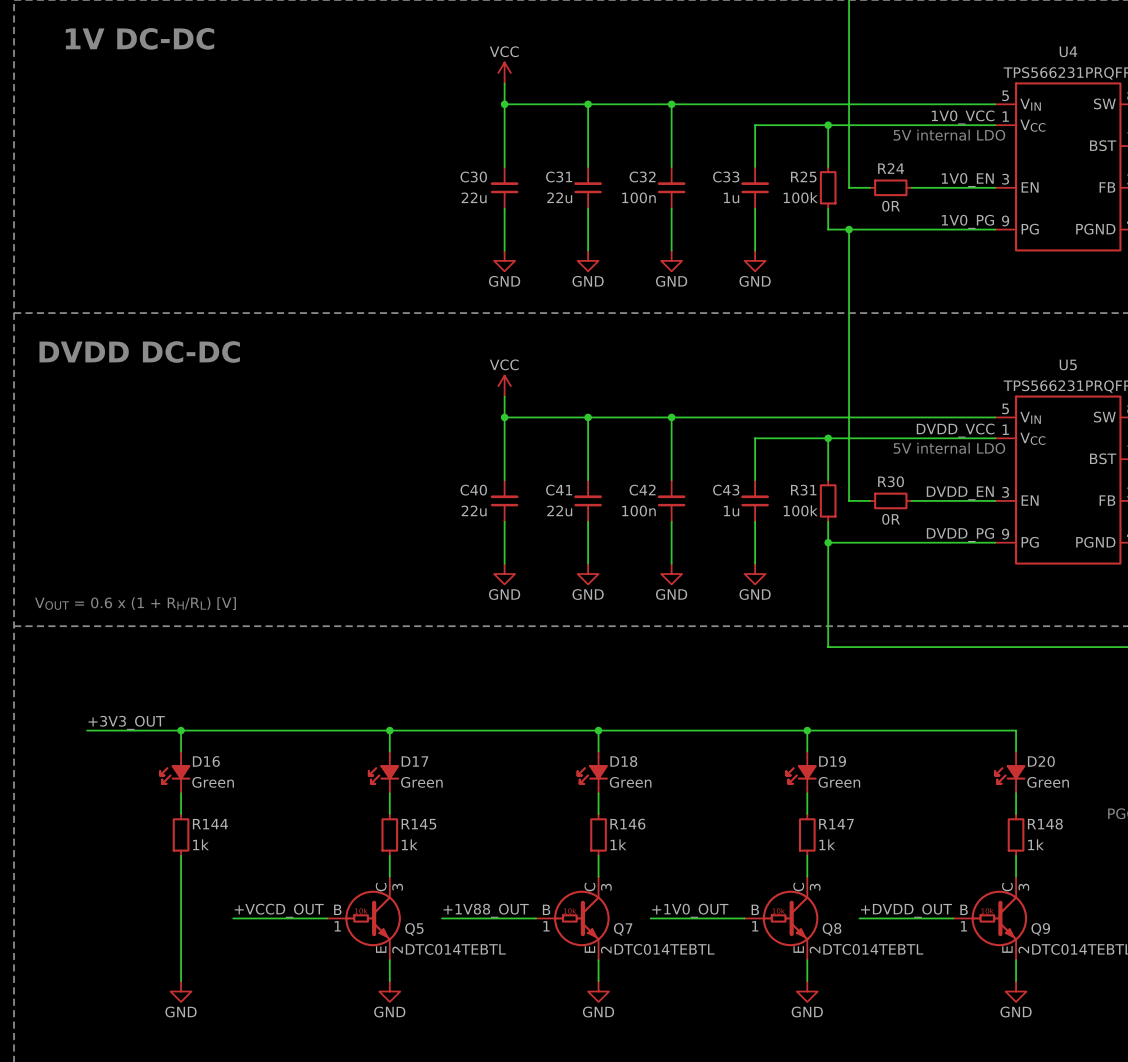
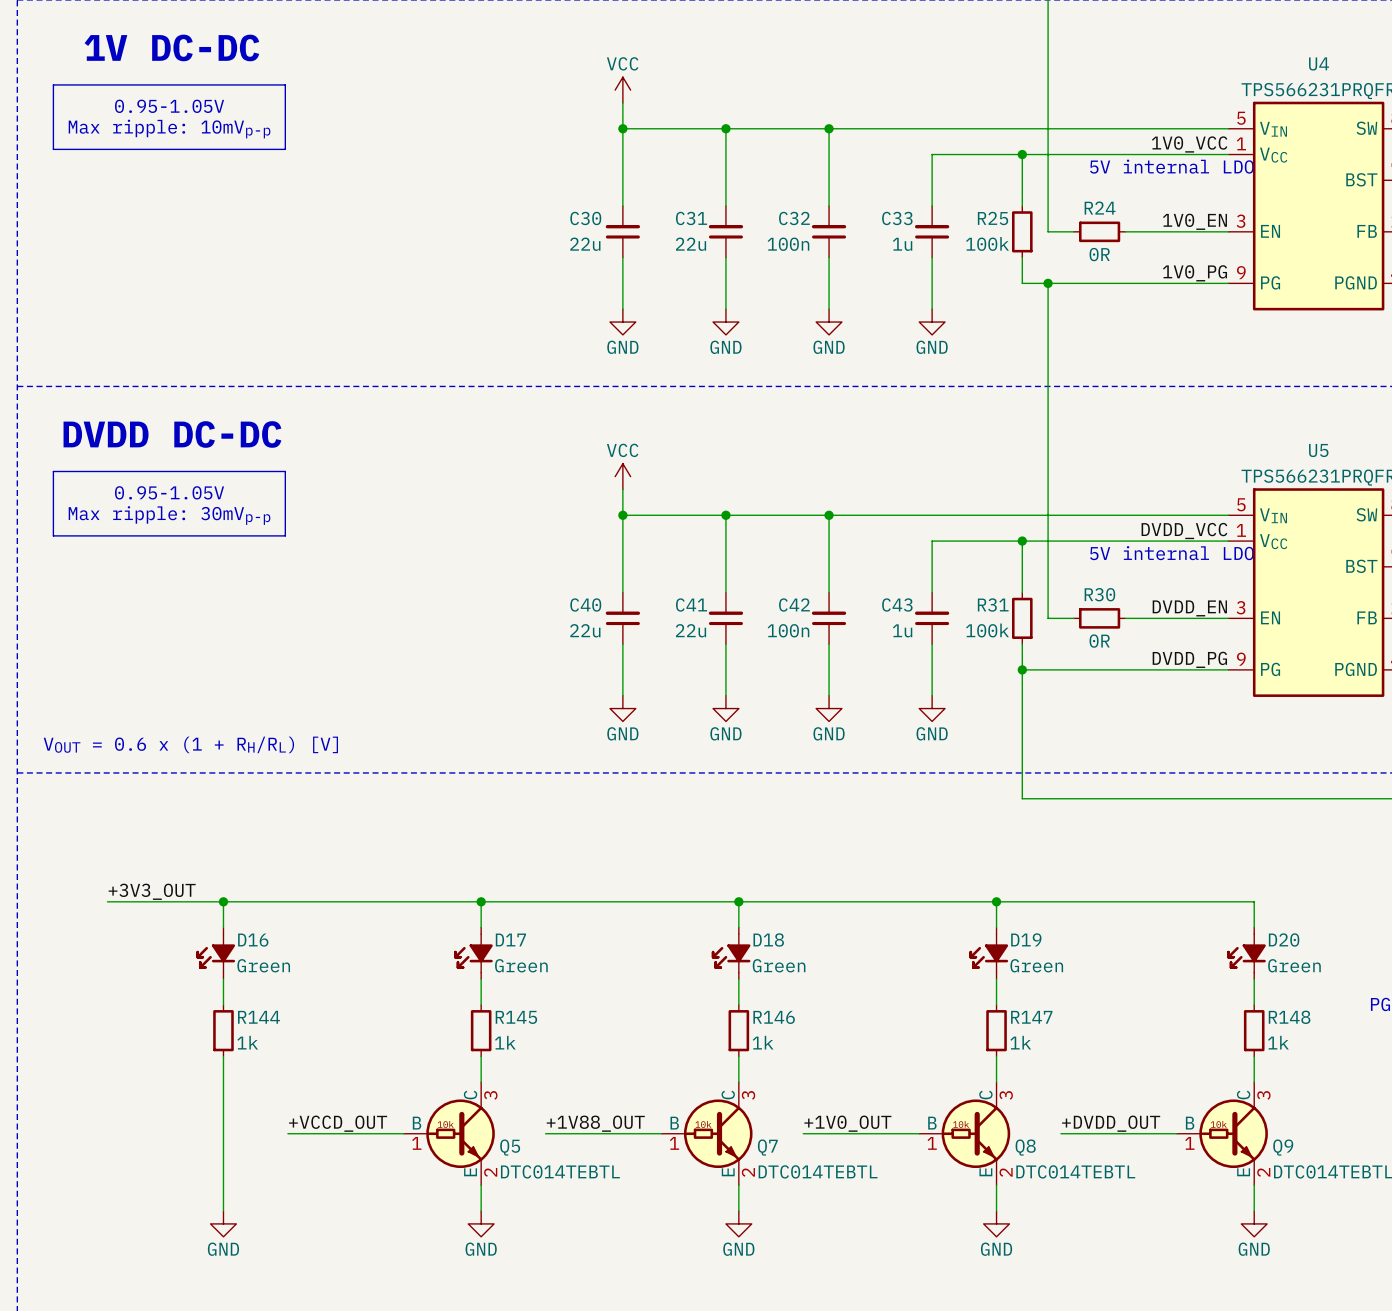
line: none -> (53, 84) (285, 84) (285, 149) (53, 149) (53, 84)
text: none -> 0.95-1.05V (169, 106)
text: none -> Max ripple: 10mVp-p (169, 129)
line: none -> (53, 471) (53, 535) (285, 535) (285, 471) (53, 471)
text: none -> 0.95-1.05V (169, 492)
text: none -> Max ripple: 30mVp-p (169, 515)

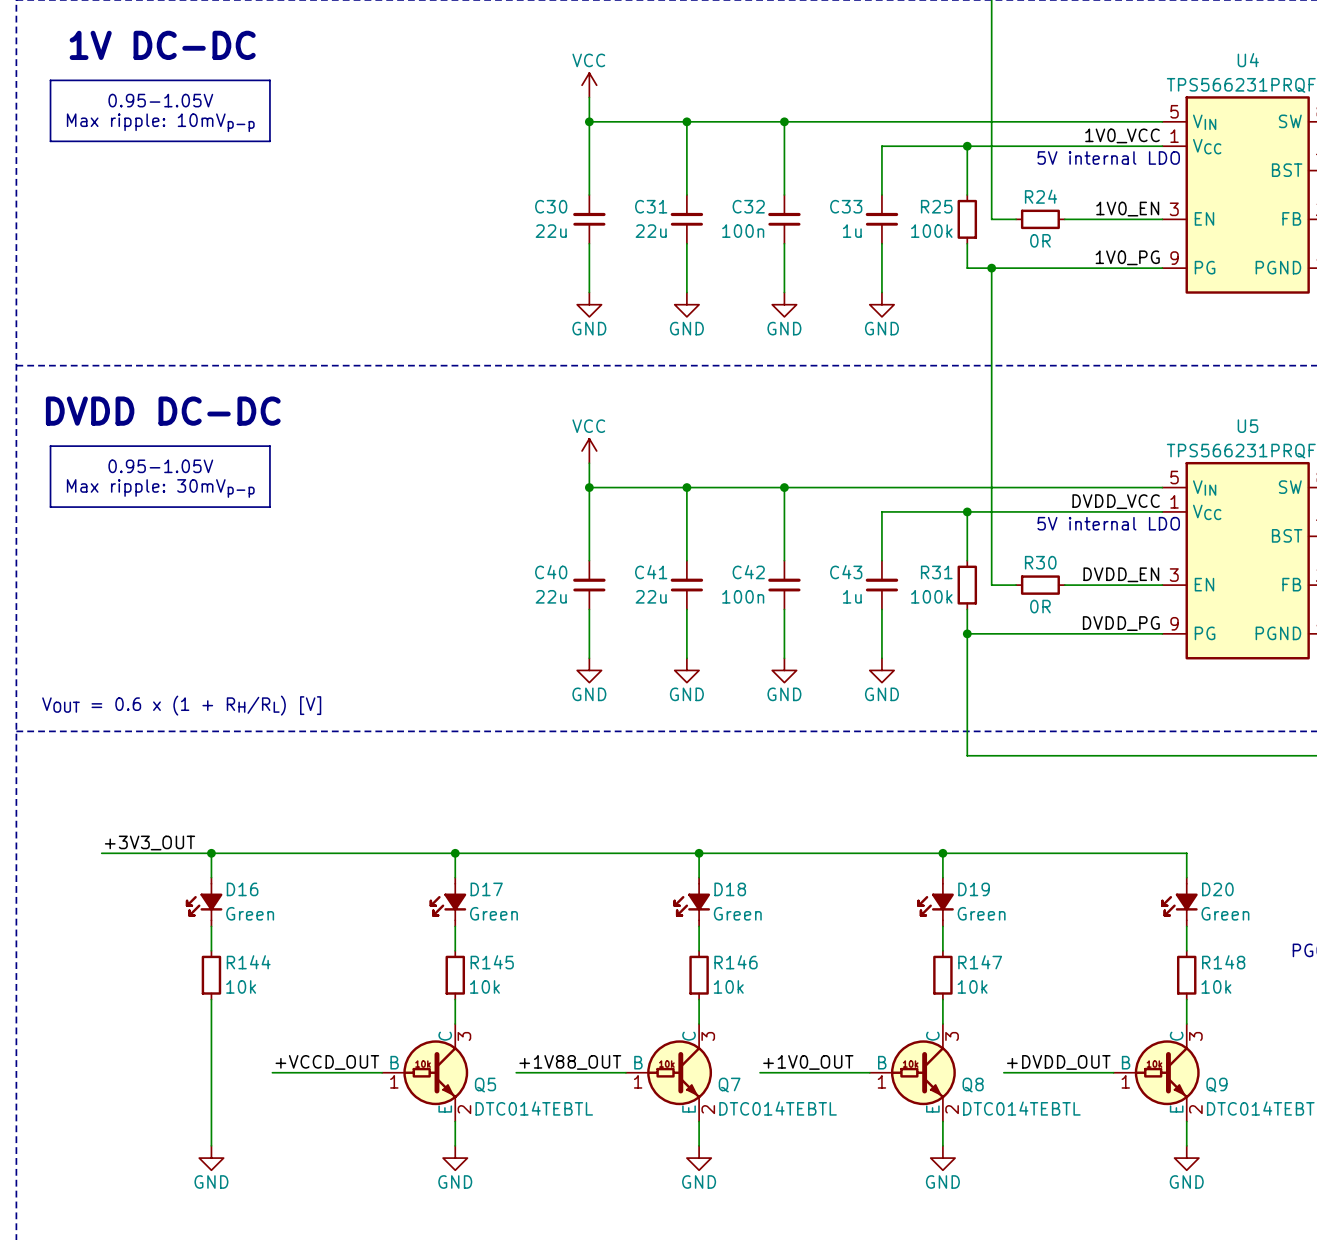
R144 text: 1k (247, 1042) -> 10k (241, 986)
R145 text: 1k (505, 1042) -> 10k (484, 986)
R146 text: 1k (763, 1042) -> 10k (728, 986)
R147 text: 1k (1020, 1042) -> 10k (972, 986)
R148 text: 1k (1278, 1042) -> 10k (1216, 986)

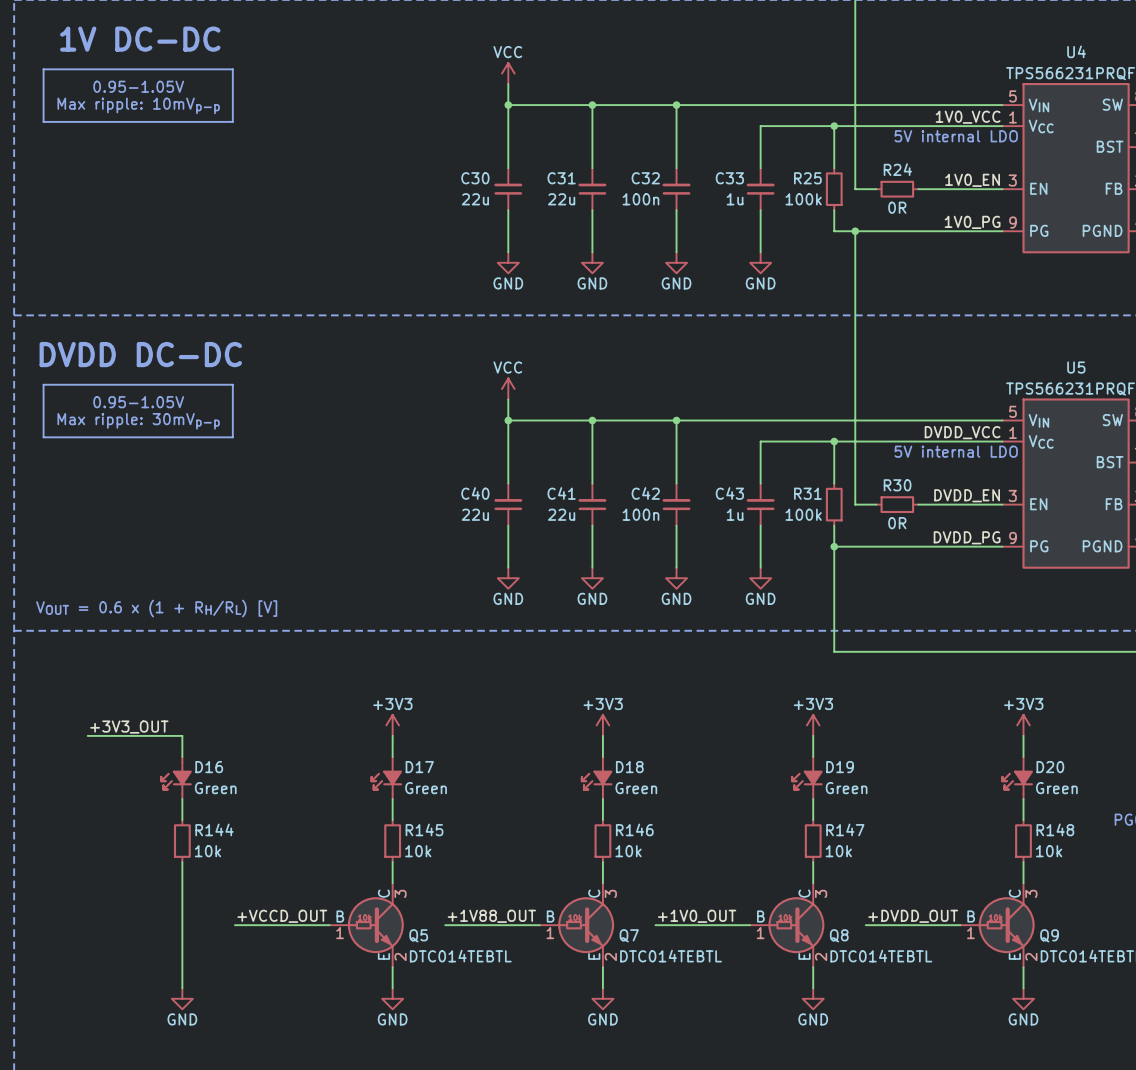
power symbol: none -> +3V3 (392, 725)
power symbol: none -> +3V3 (602, 725)
power symbol: none -> +3V3 (813, 725)
power symbol: none -> +3V3 (1023, 725)
wire: (211, 853) (1186, 853) -> none
junction: (211, 853) -> none
junction: (455, 853) -> none
junction: (699, 853) -> none
junction: (942, 853) -> none

